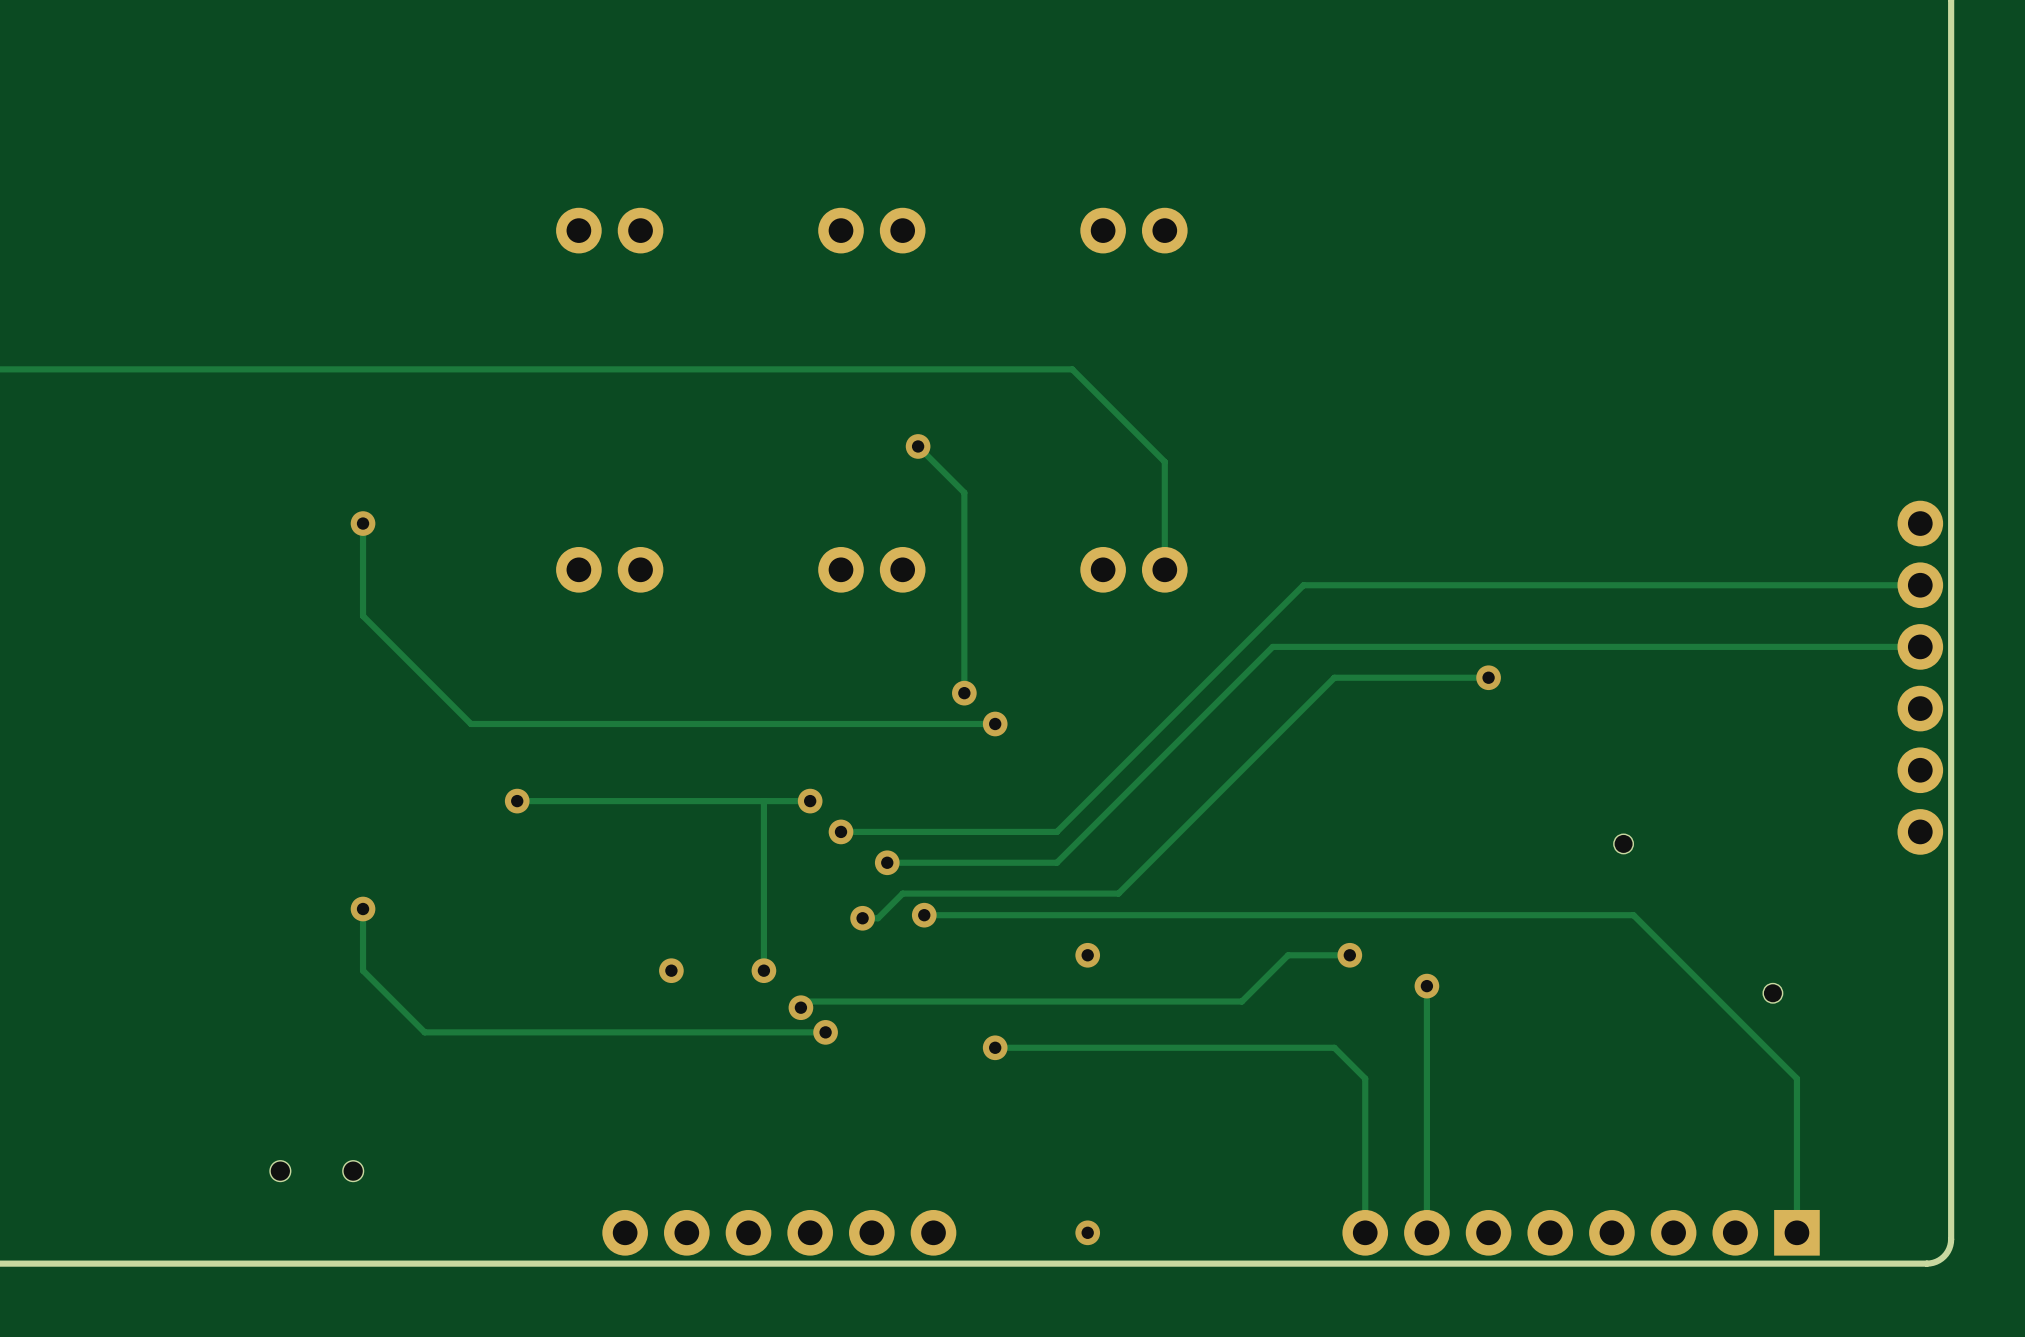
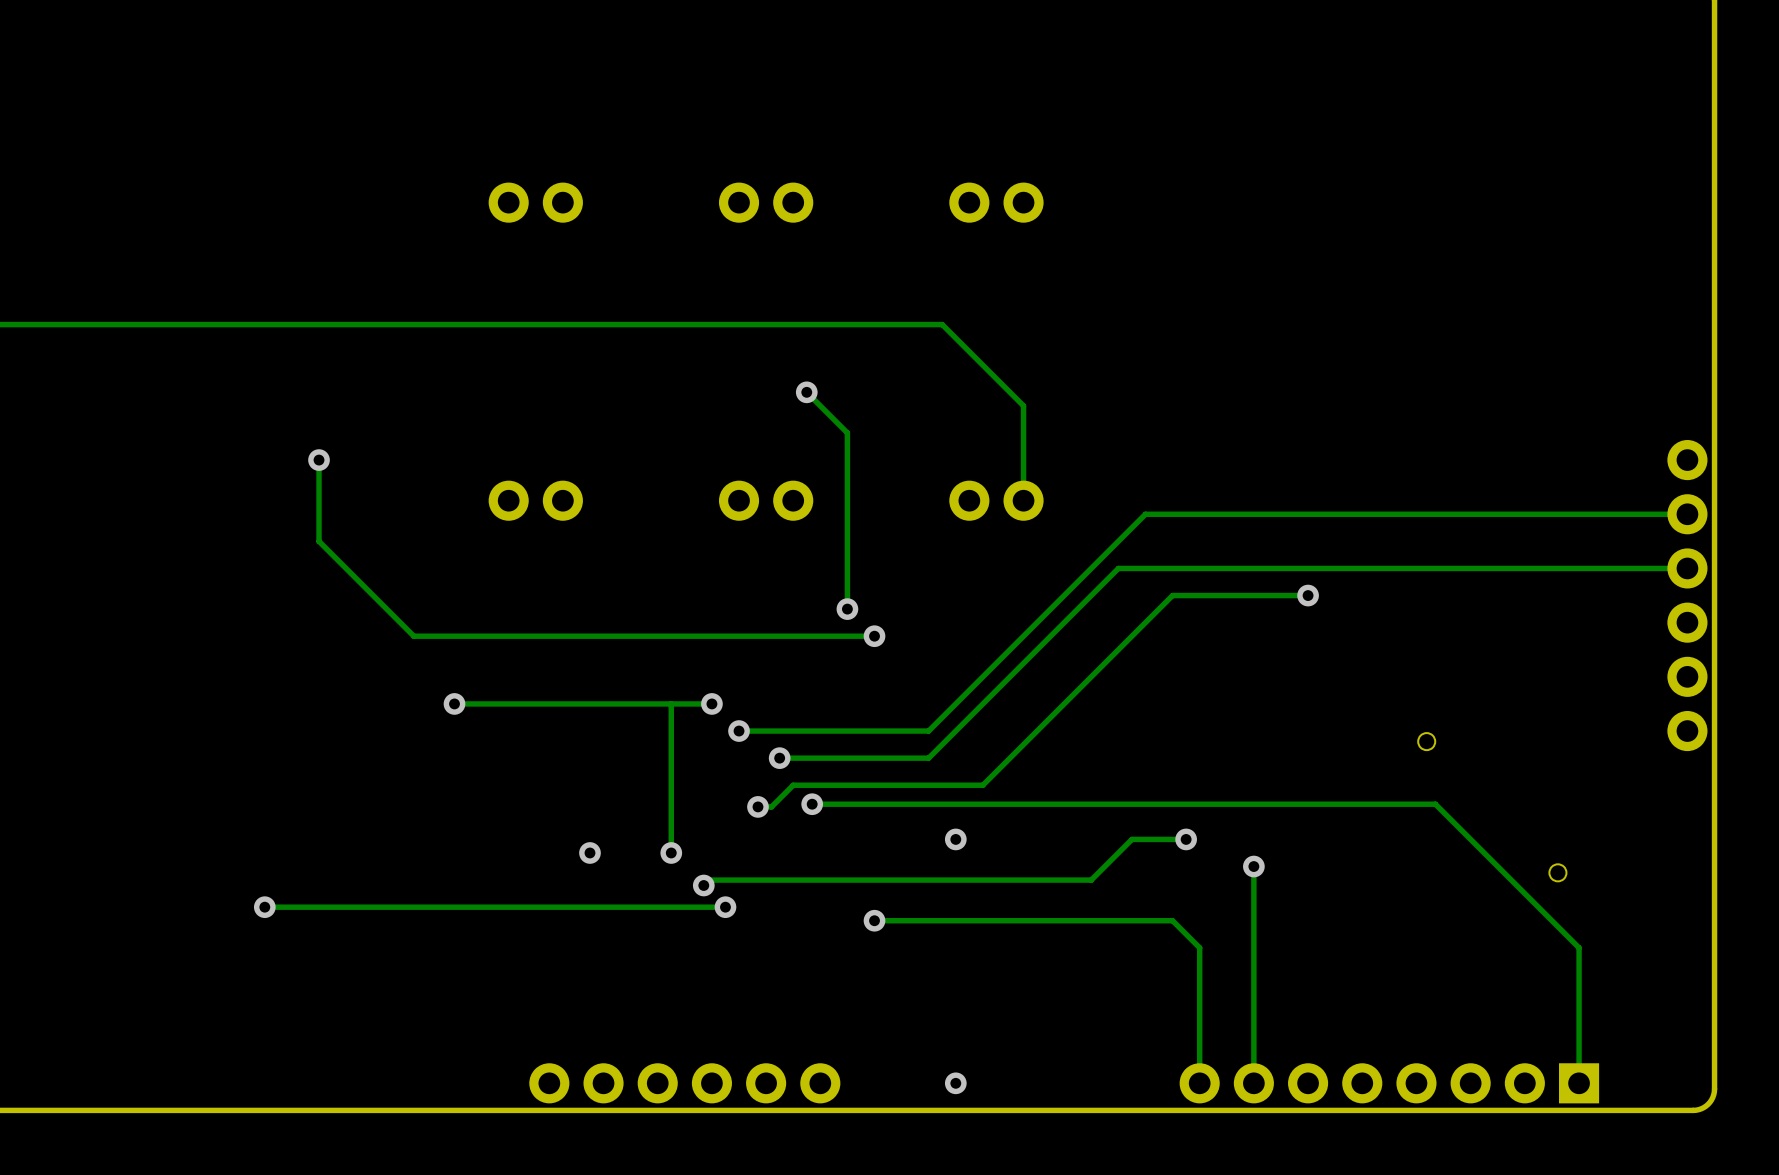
track: (363, 909) (363, 970) (424, 1032) -> (264, 907) (373, 907)
via position: (363, 909) -> (264, 907)
part: (316, 1171) -> none

